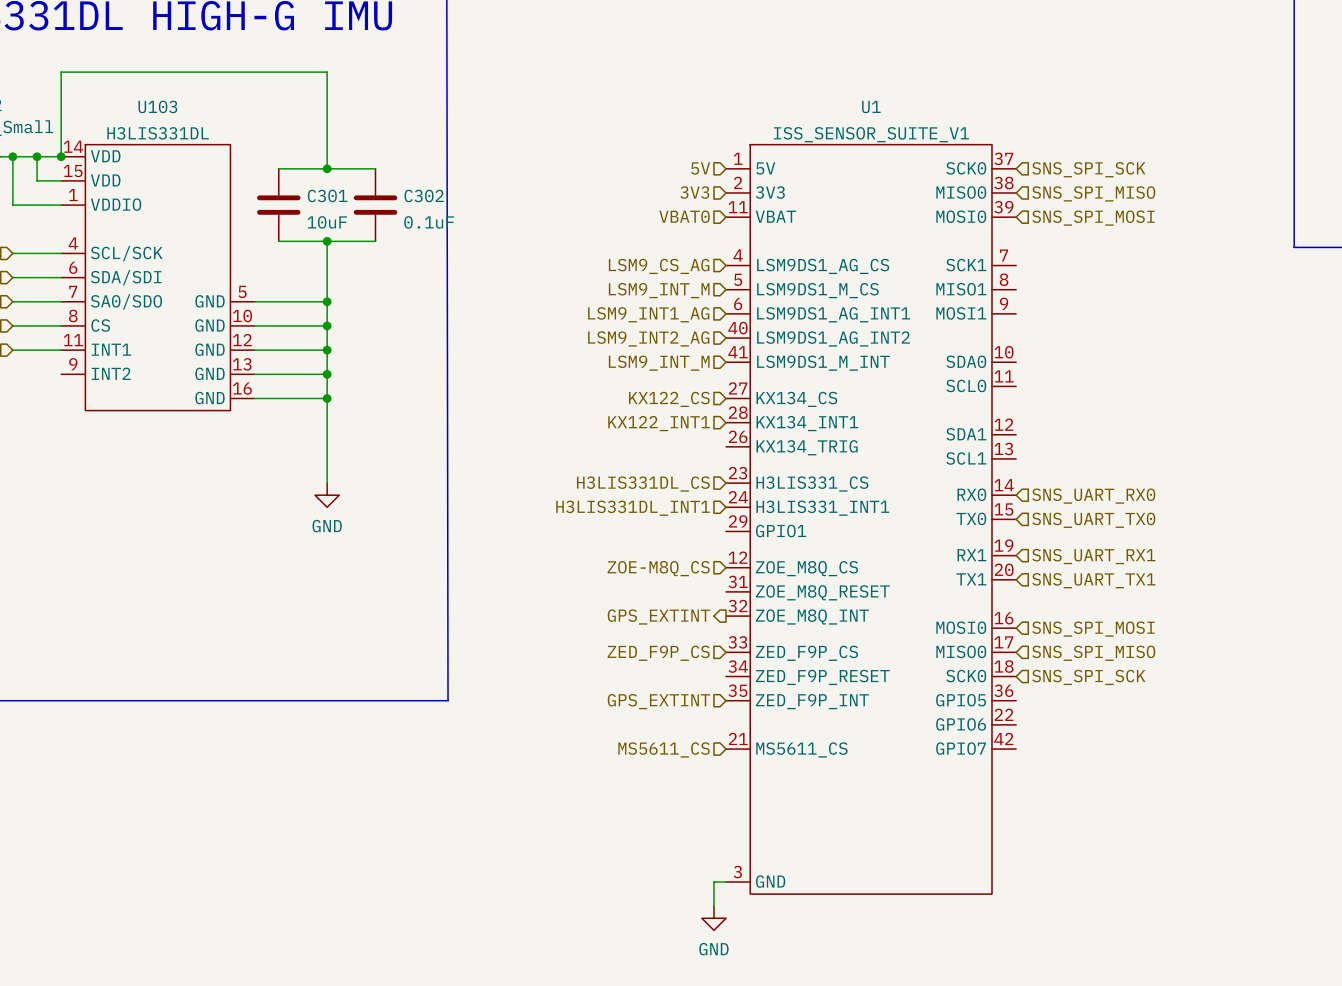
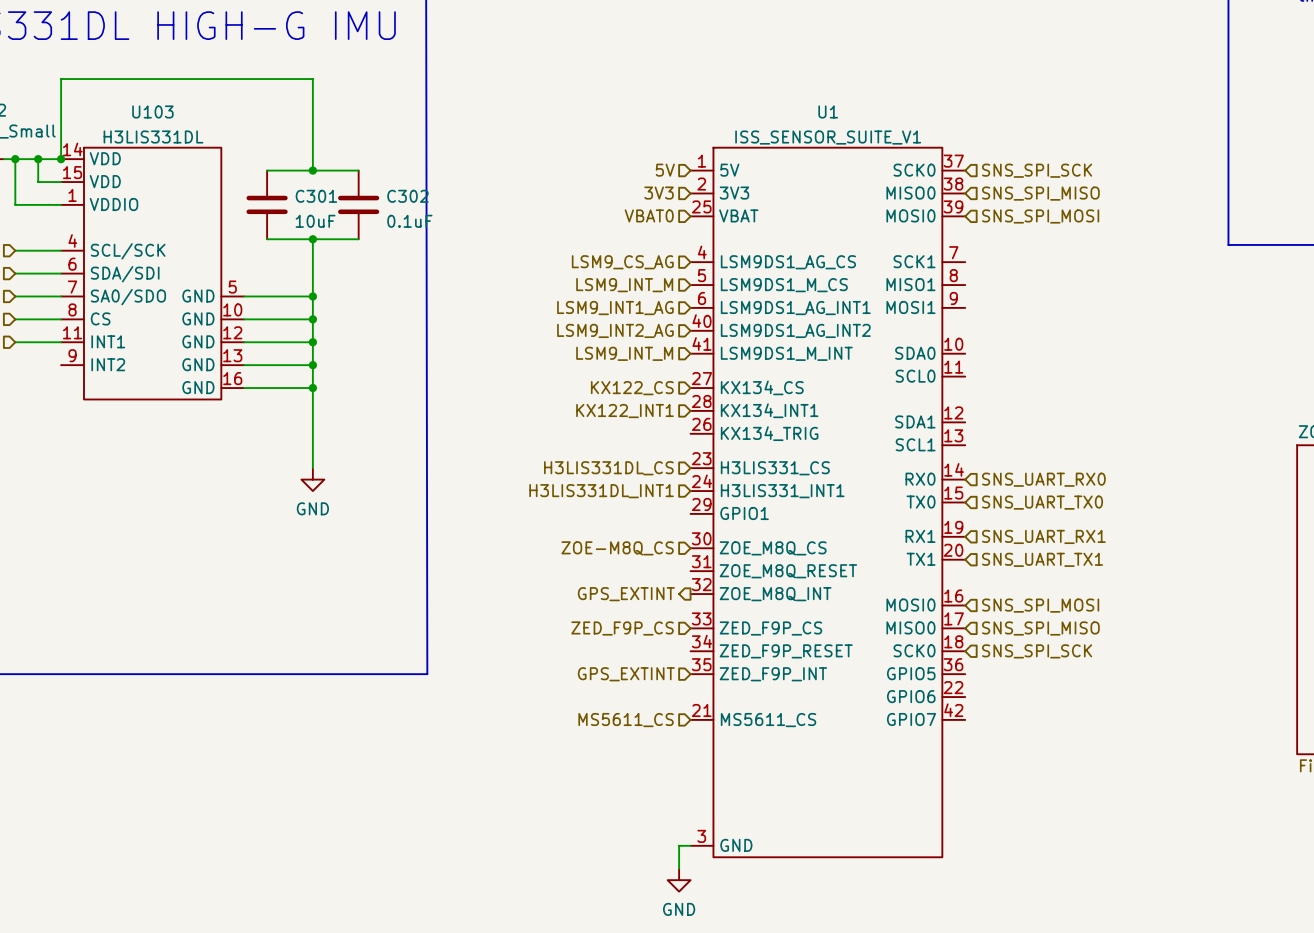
U1 pin number: 11 (738, 207) -> 25 (701, 206)
U1 pin number: 12 (738, 557) -> 30 (701, 538)

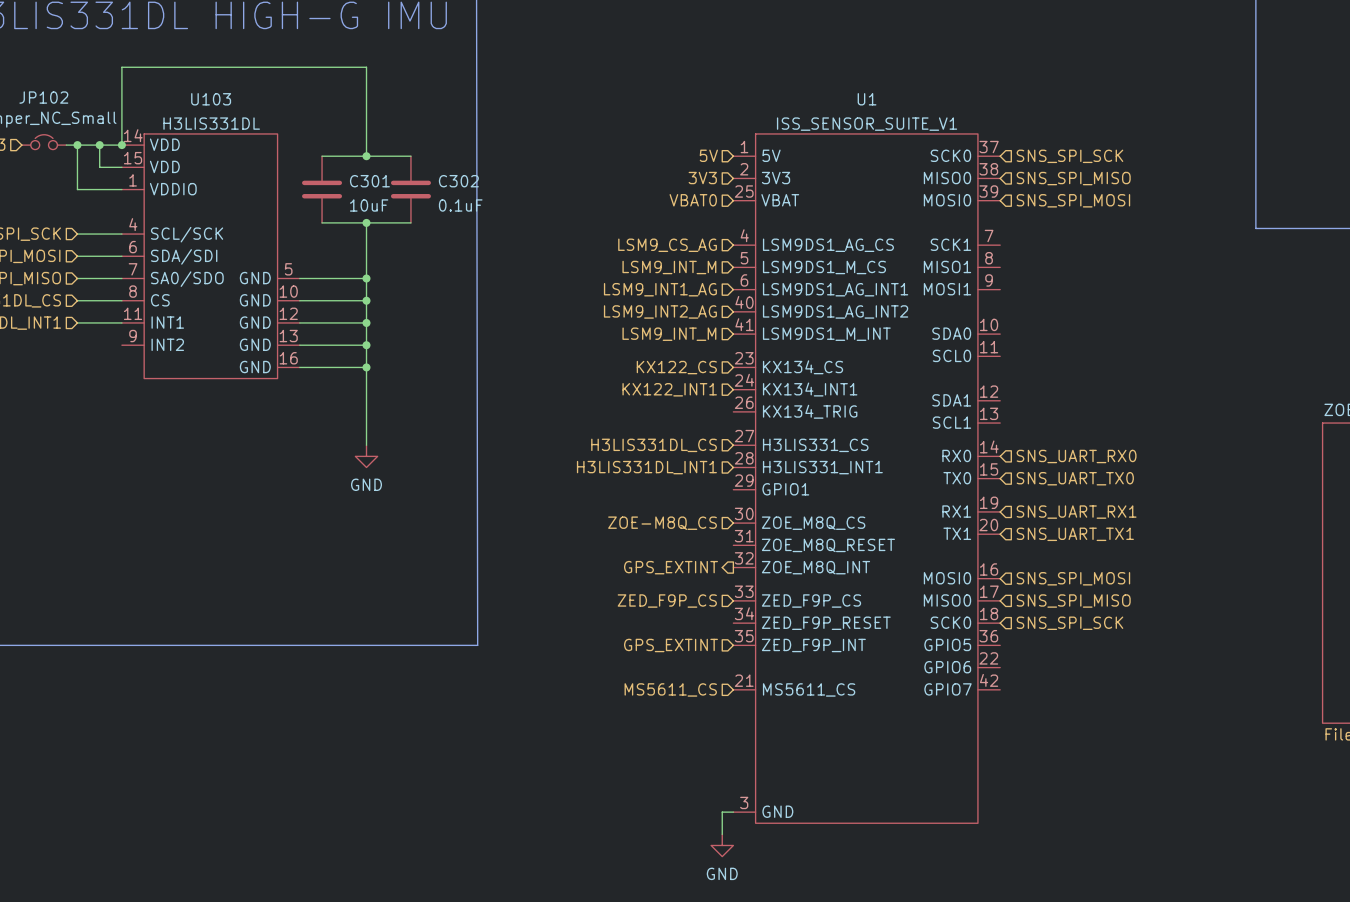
U1 pin number: 27 (702, 378) -> 23 (744, 358)
U1 pin number: 28 (701, 401) -> 24 (744, 380)
U1 pin number: 23 (701, 458) -> 27 (744, 436)
U1 pin number: 24 (702, 481) -> 28 (744, 458)

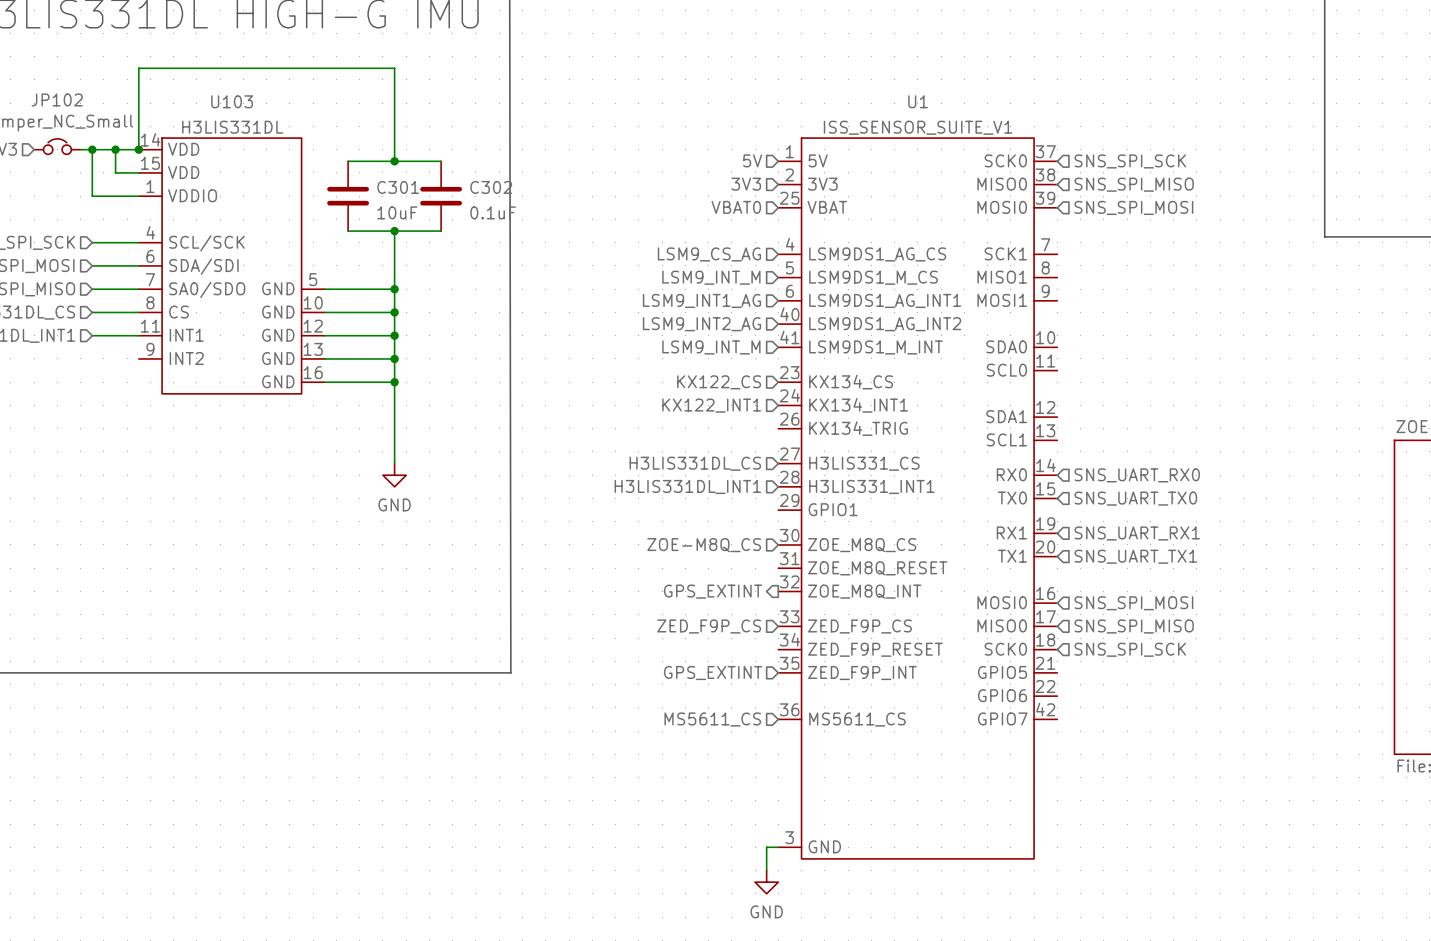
U1 pin number: 36 (988, 636) -> 21 (1045, 663)
U1 pin number: 21 (744, 680) -> 36 (789, 709)

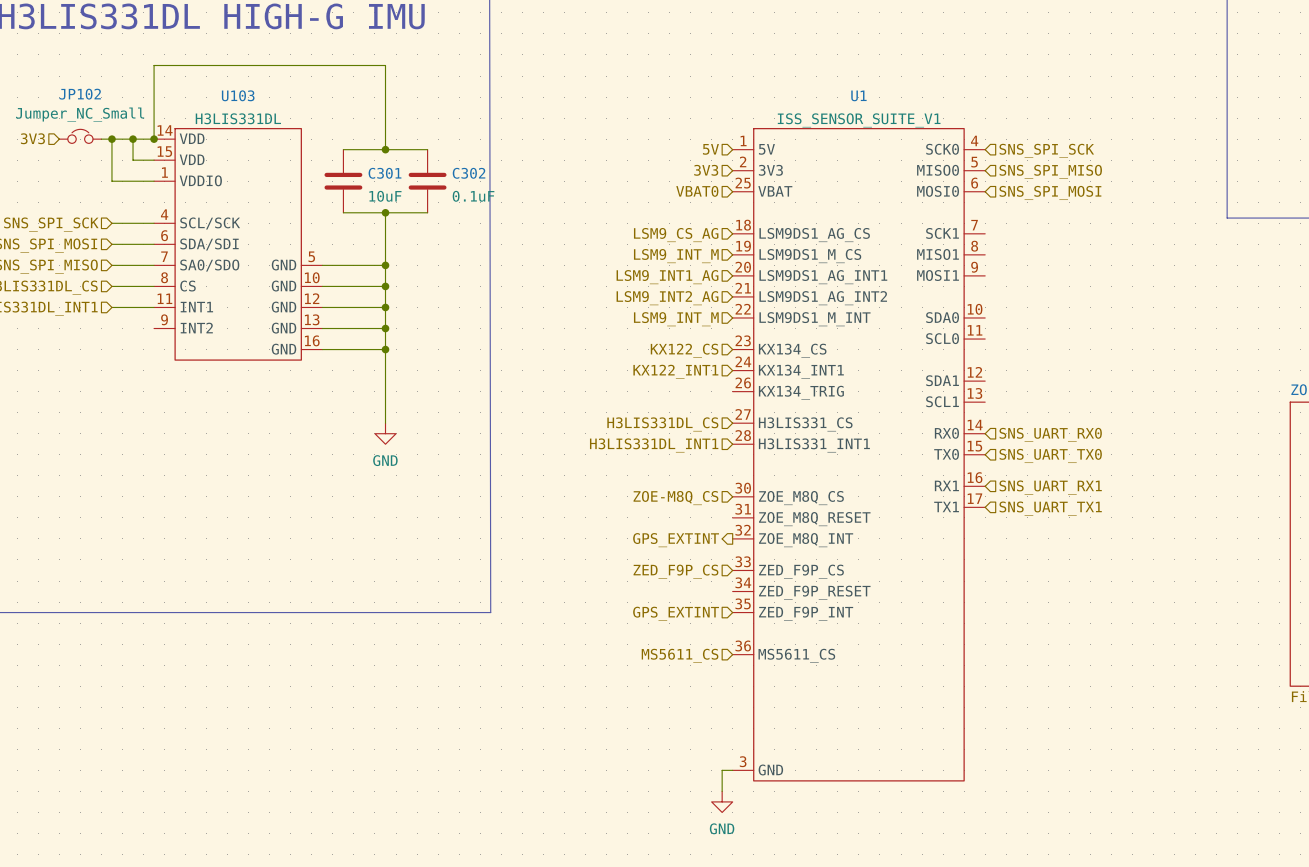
U1 symbol: [778, 137, 1058, 860] -> [732, 127, 986, 782]
hierarchical label: SNS_SPI_MOSI (1133, 603) -> none
hierarchical label: SNS_SPI_MISO (1134, 626) -> none
hierarchical label: SNS_SPI_SCK (1130, 649) -> none

